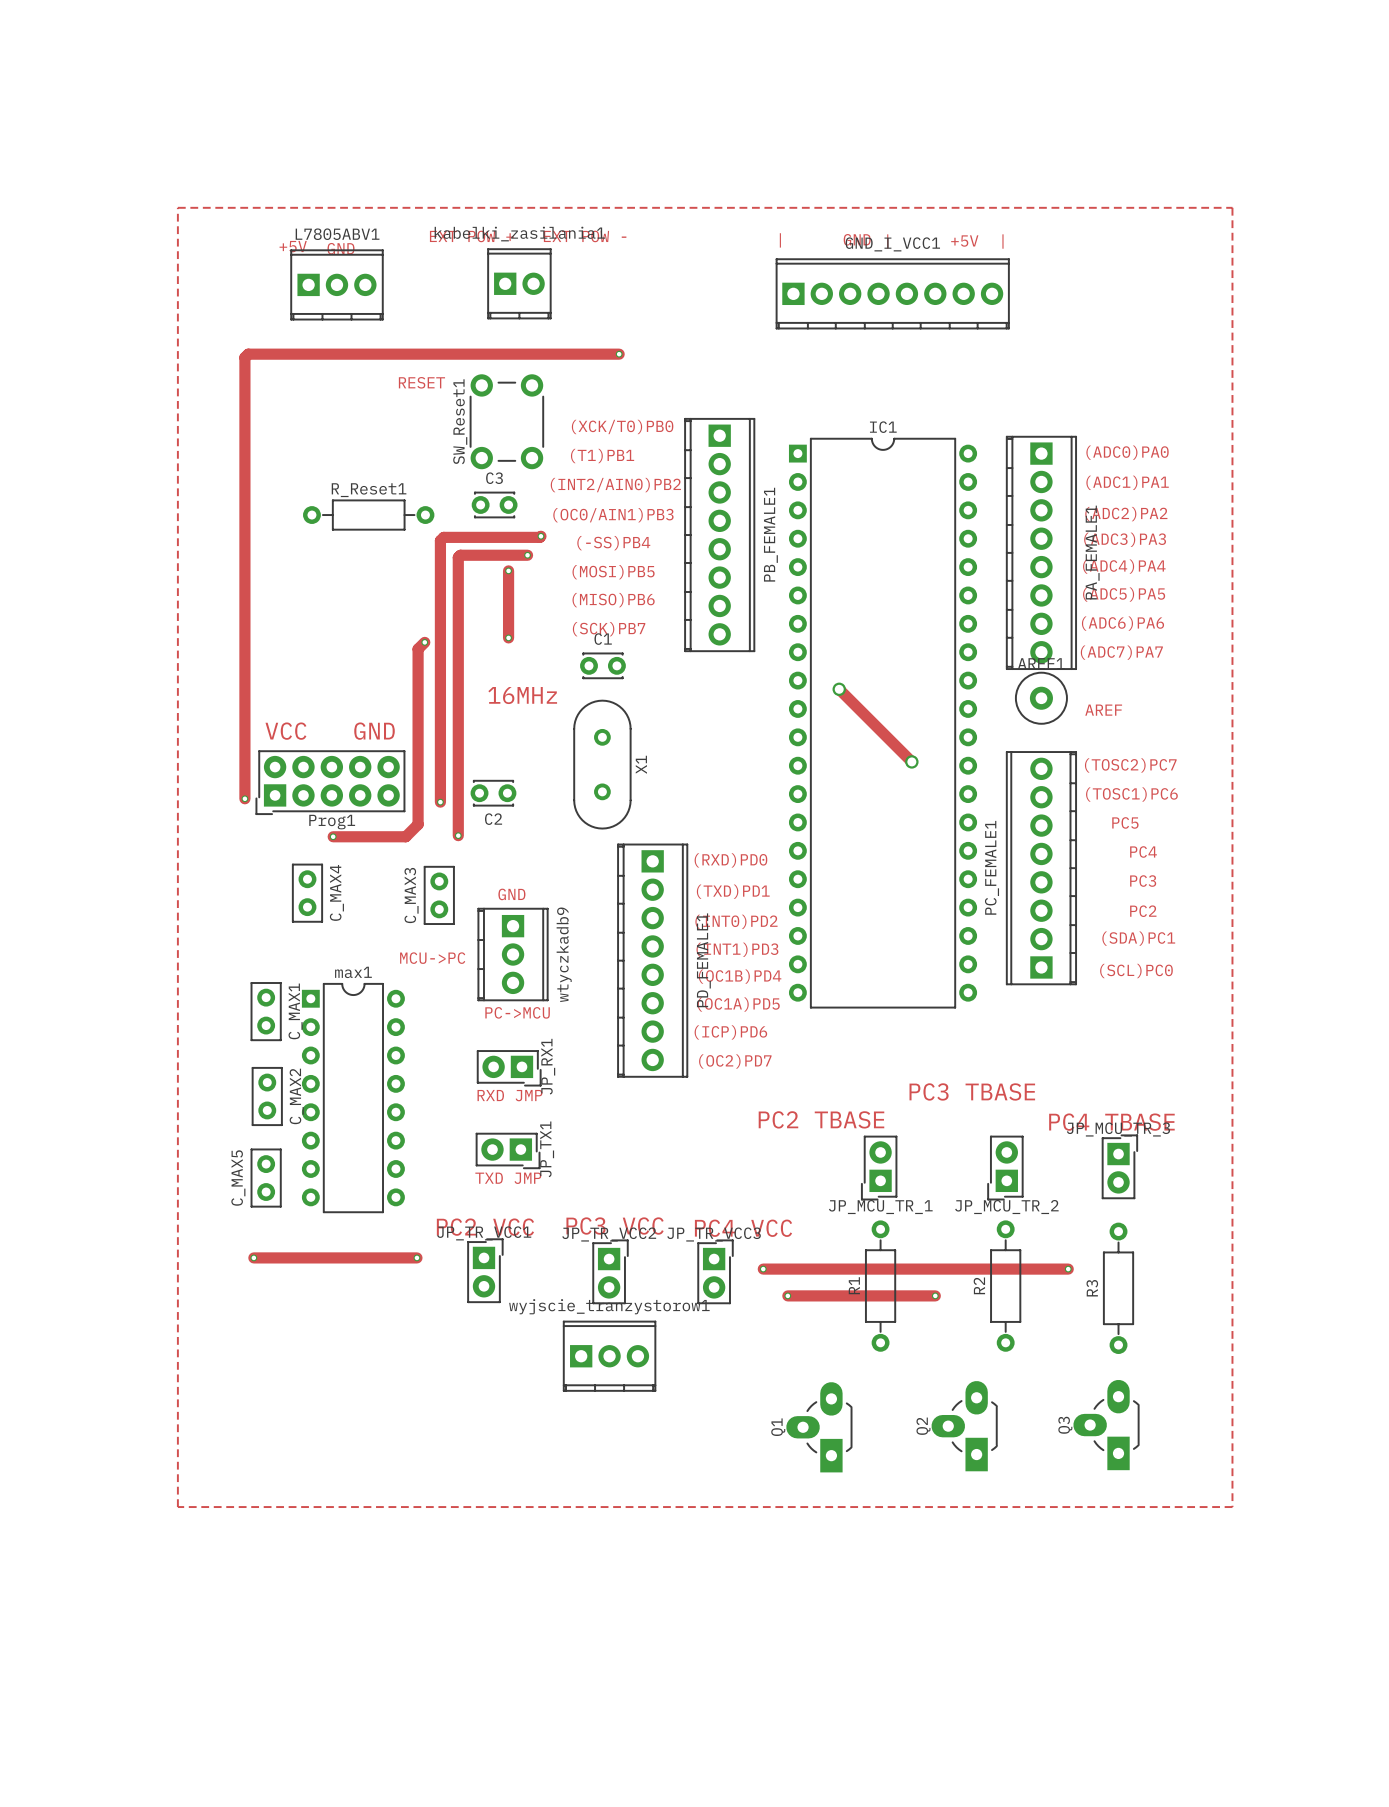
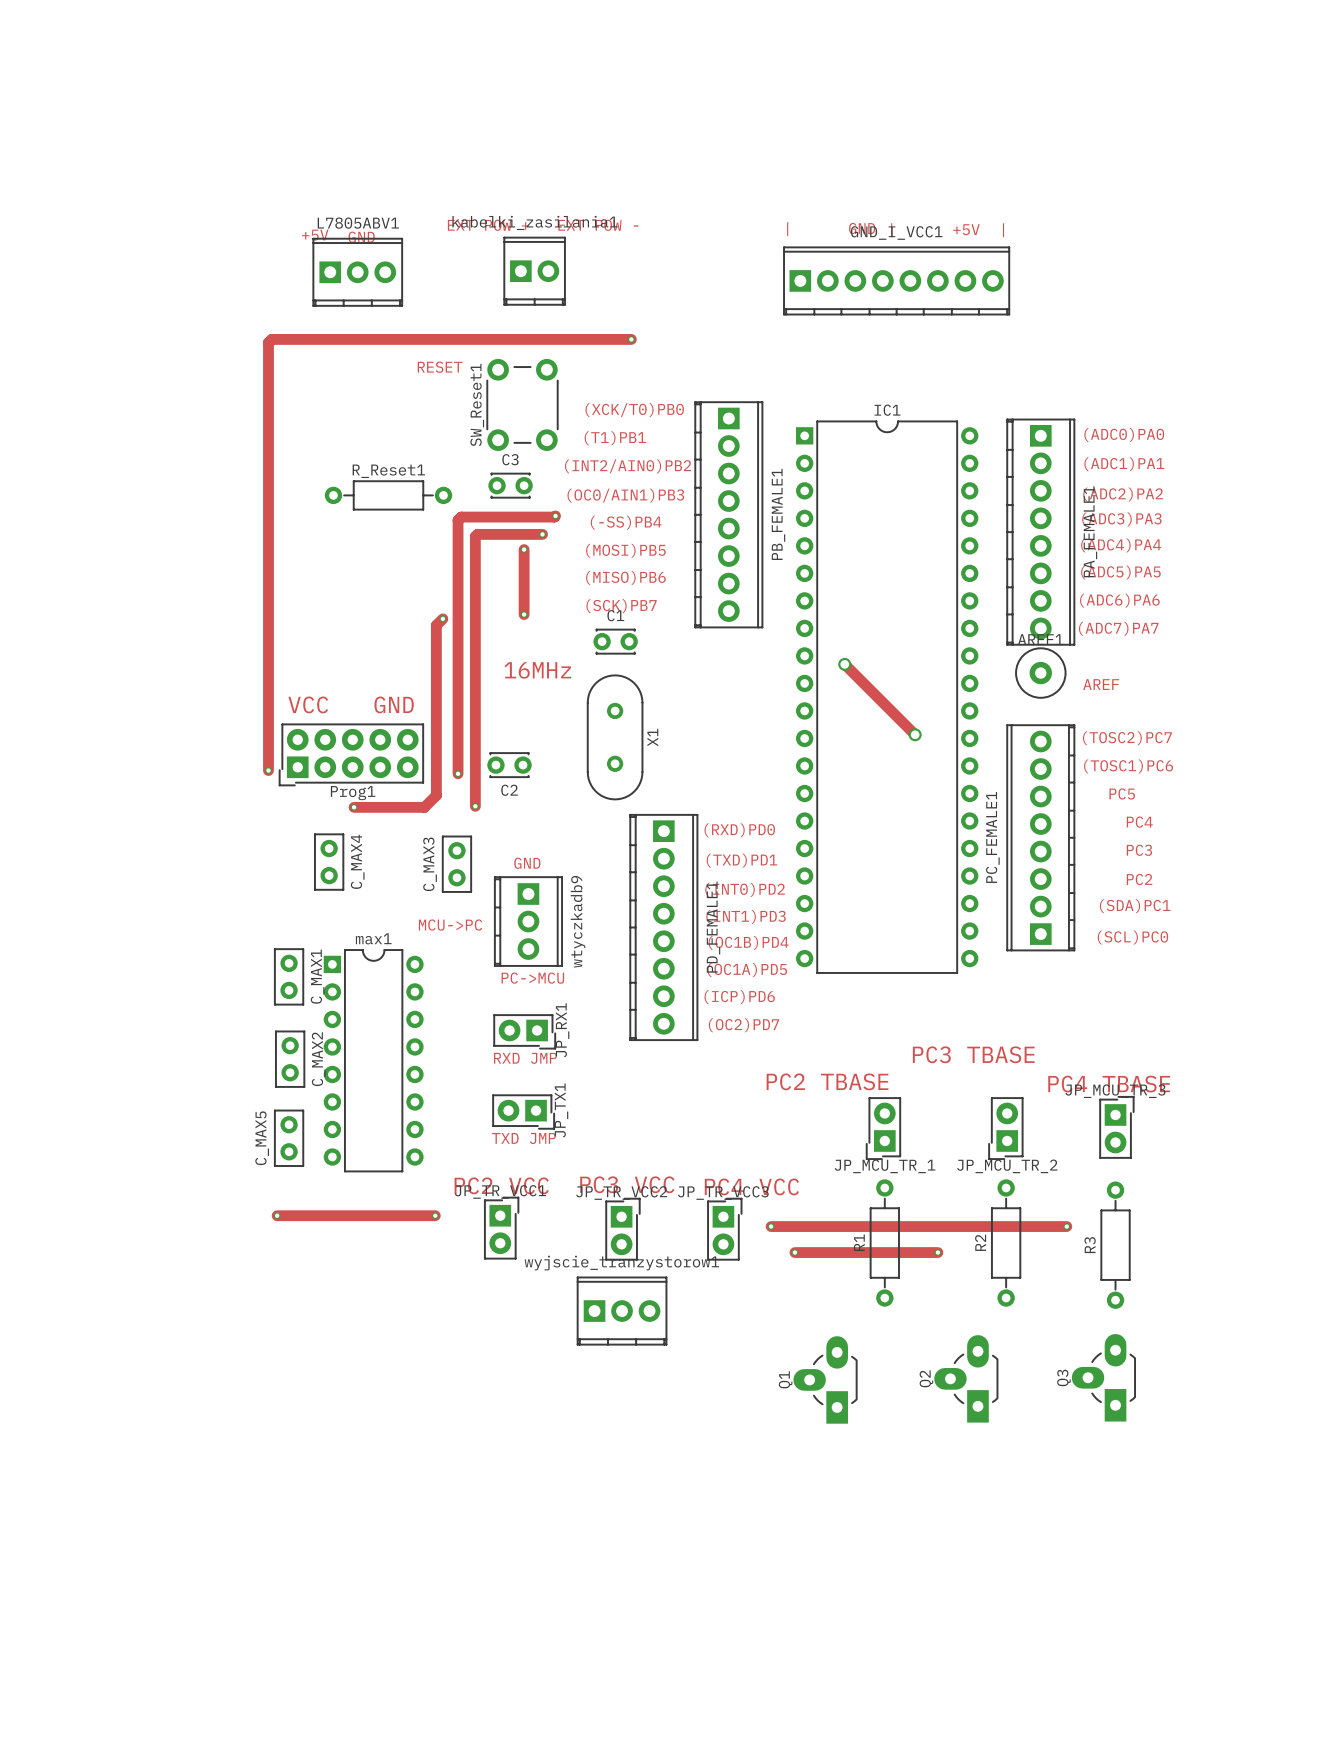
zone outline: (177, 207) (1232, 207) (1232, 1507) (177, 1507) (177, 207) -> none

